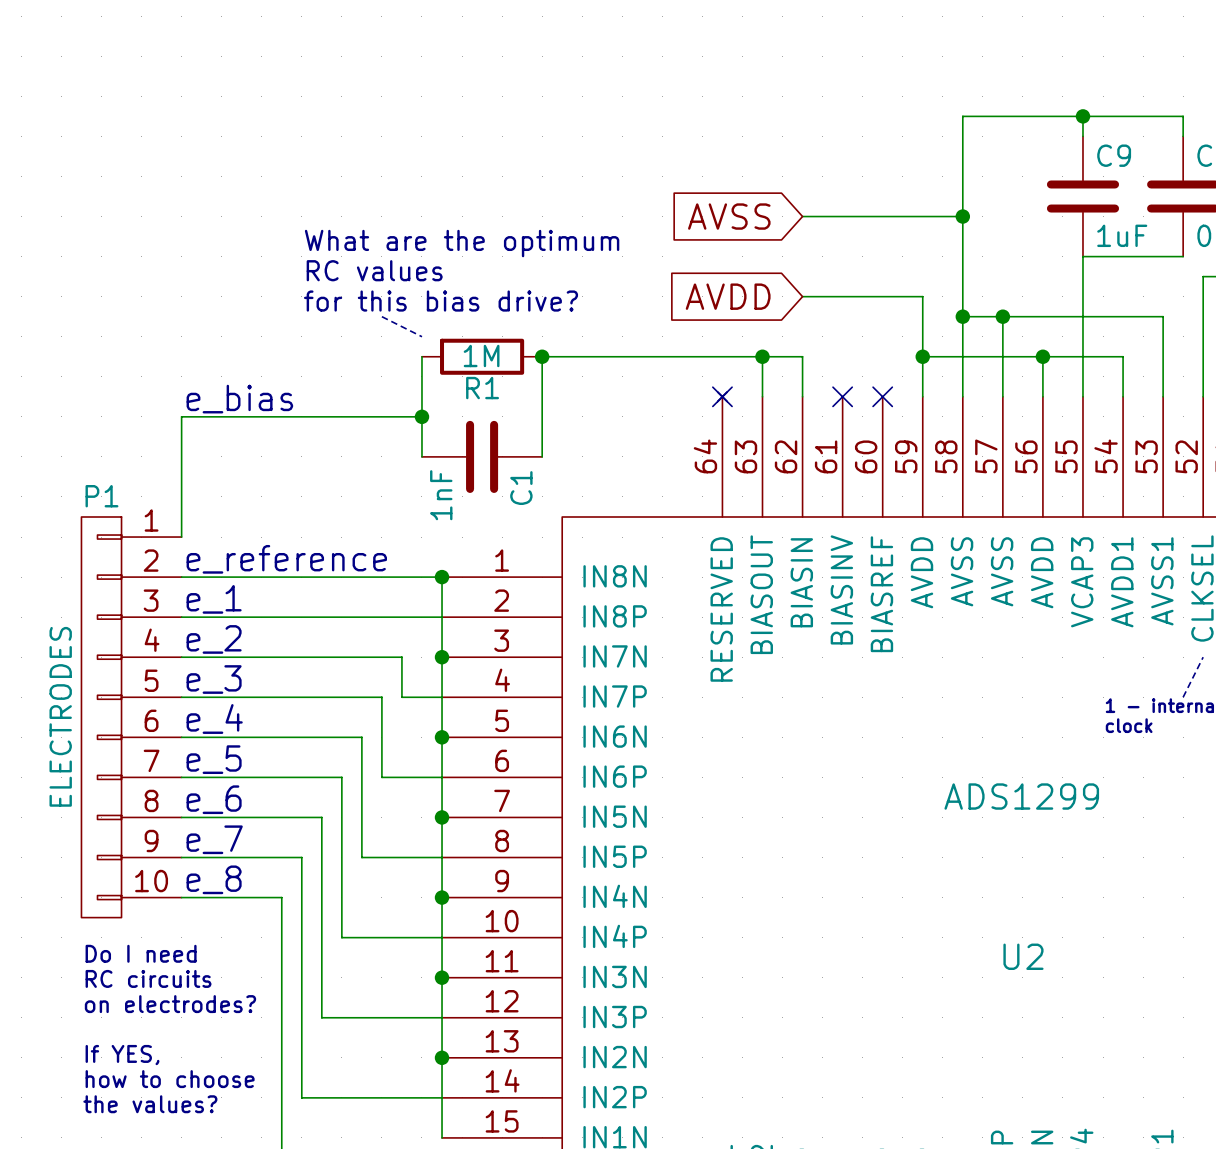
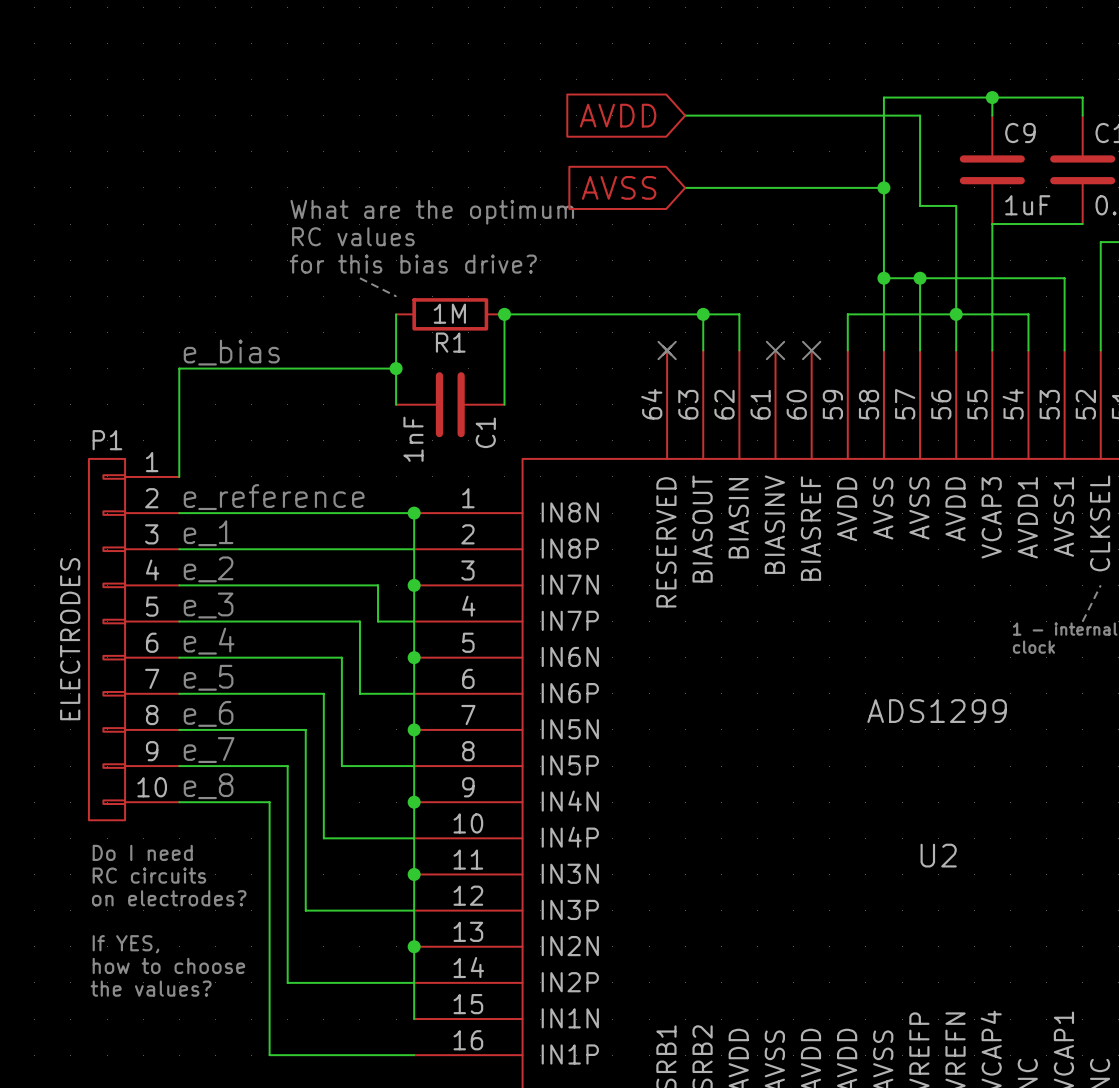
wire: none -> (685, 115) (920, 115) (920, 205) (956, 205) (956, 314)
global label position: AVSS (729, 216) -> AVSS (619, 187)
wire: none -> (685, 187) (739, 187)
global label position: AVDD (728, 296) -> AVDD (618, 115)
wire: (802, 296) (922, 296) (922, 356) -> none
junction: (922, 356) -> none

